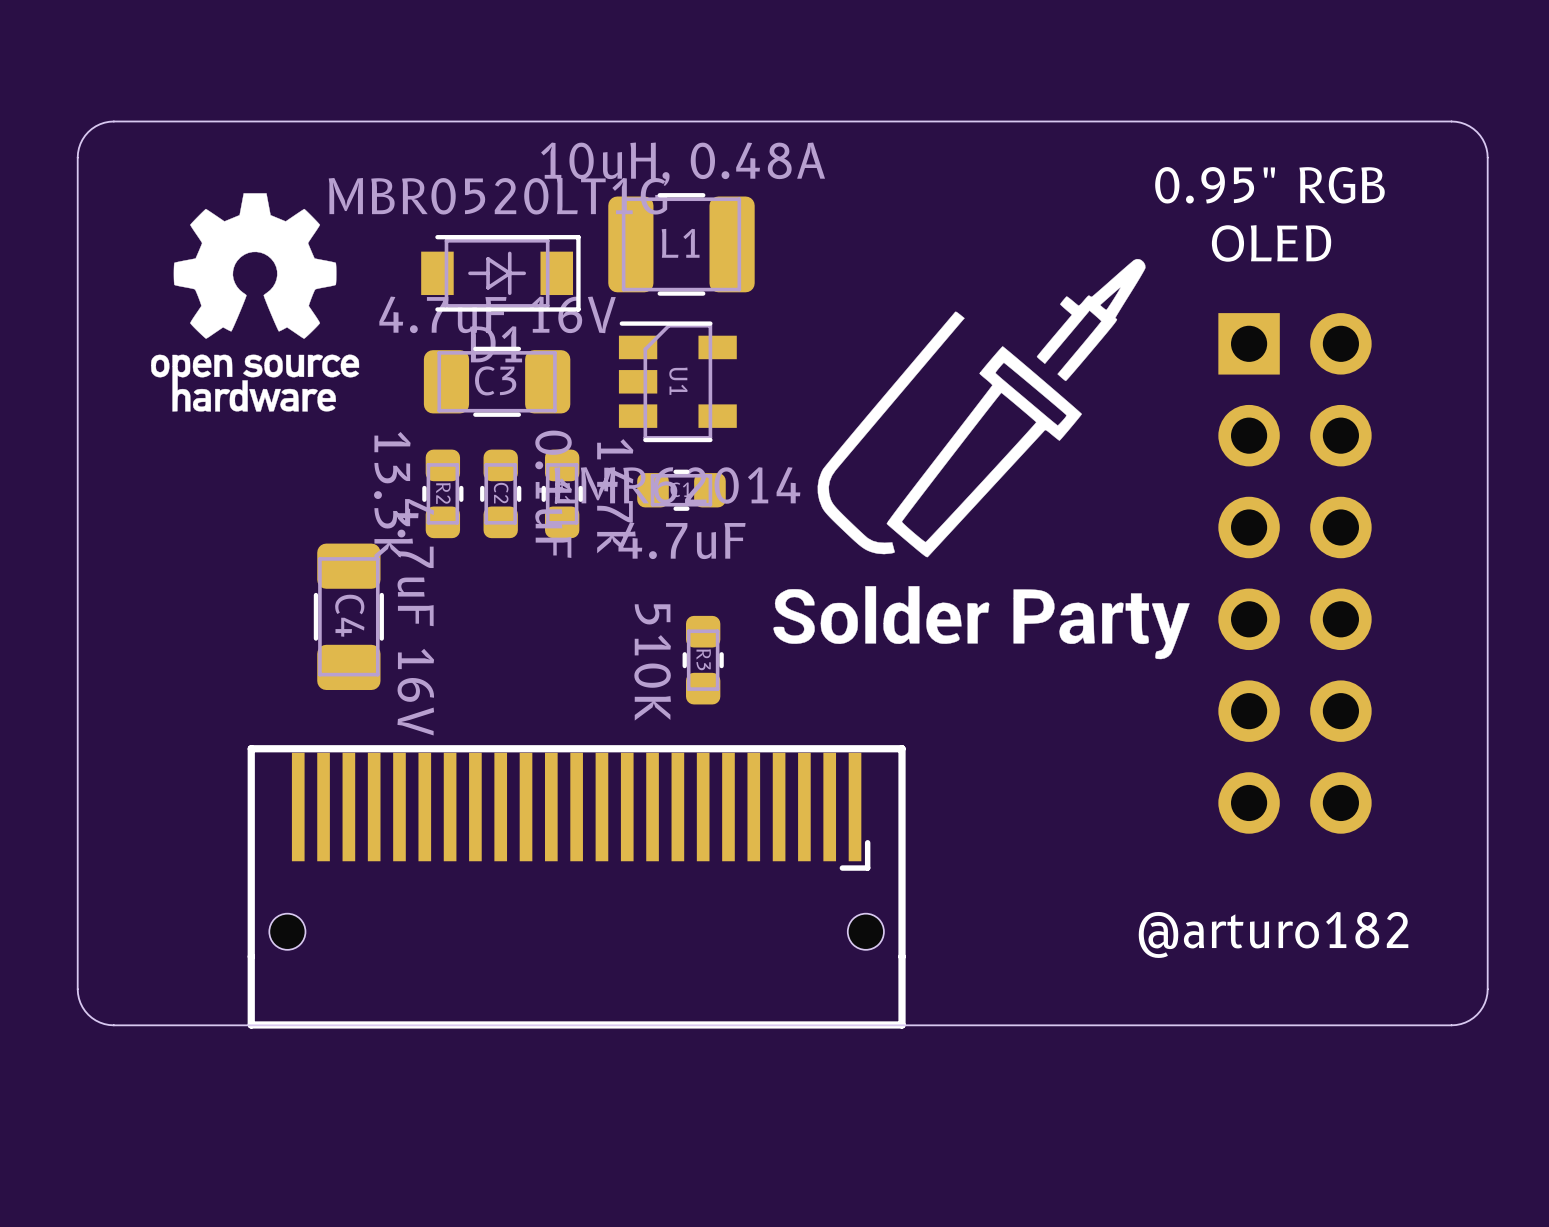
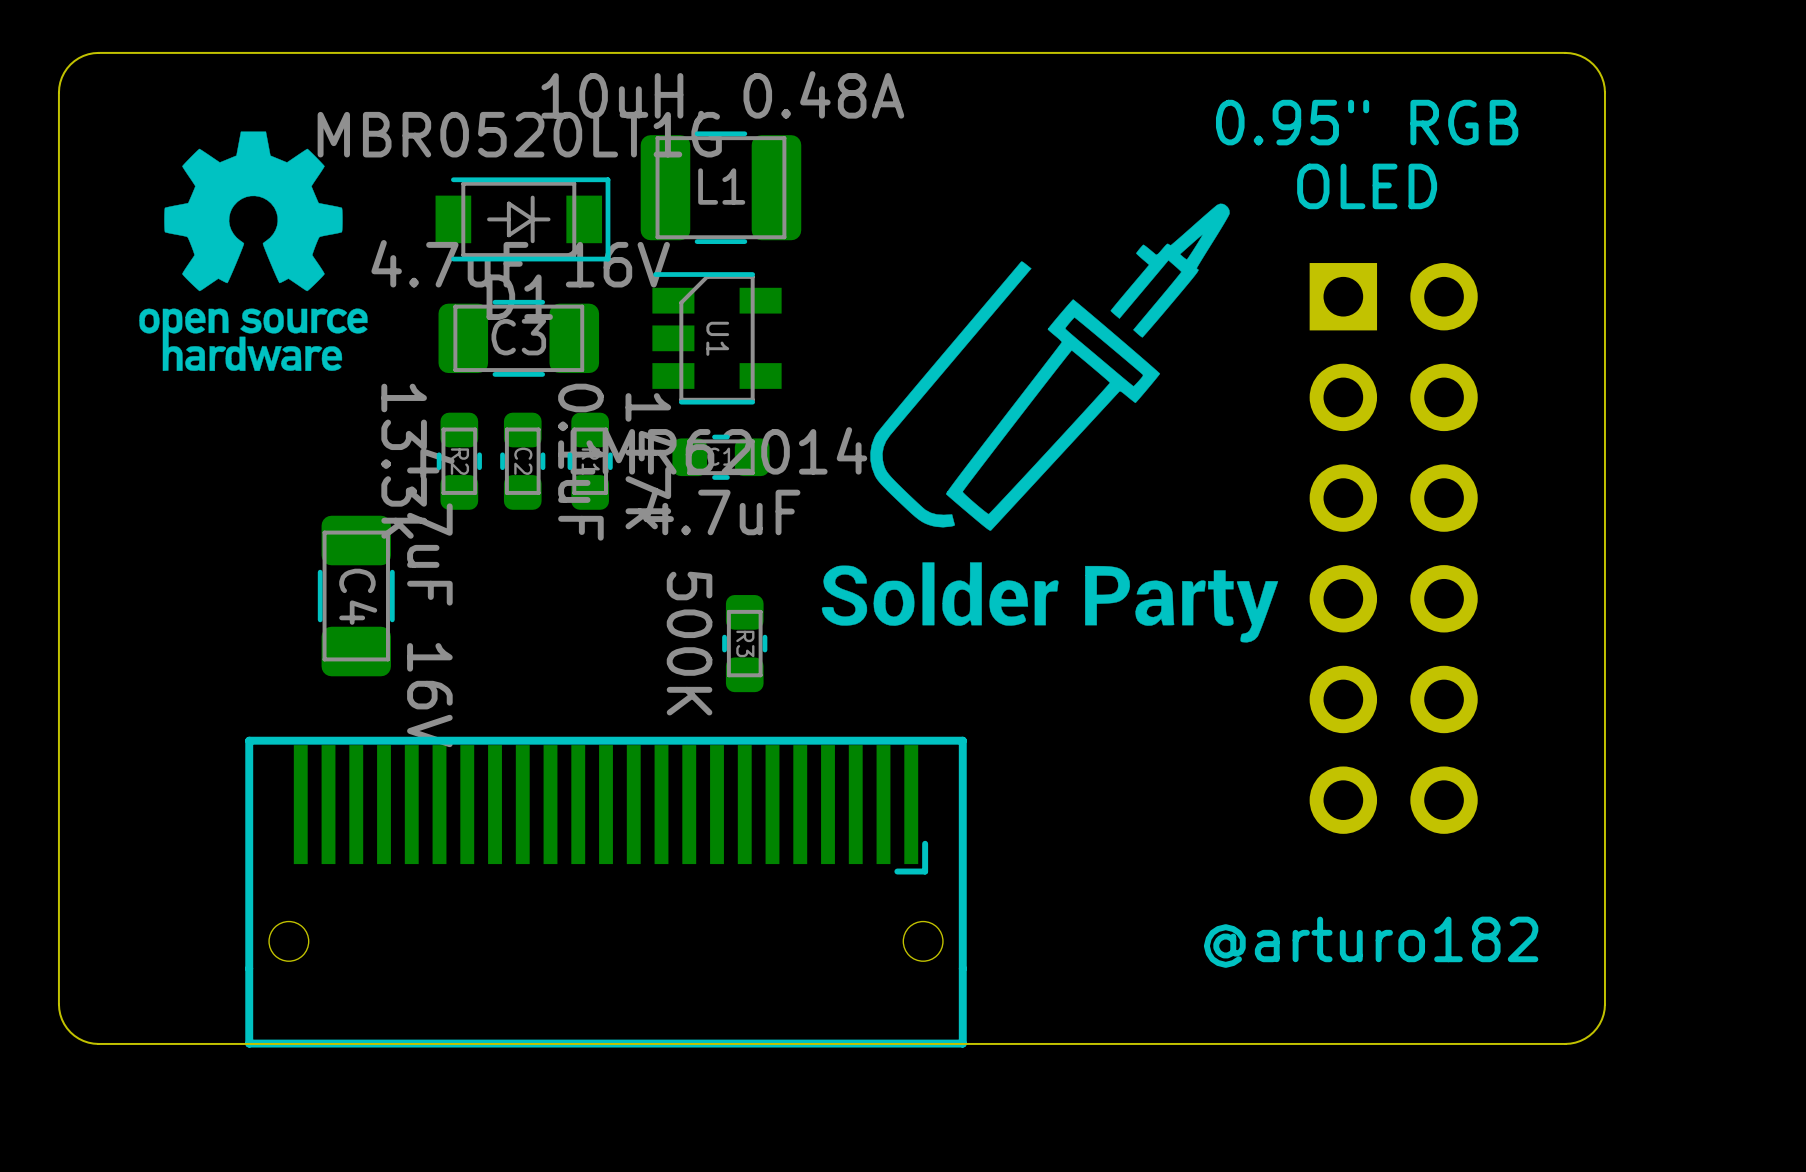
R3 value: 510K (652, 662) -> 500K (689, 643)

